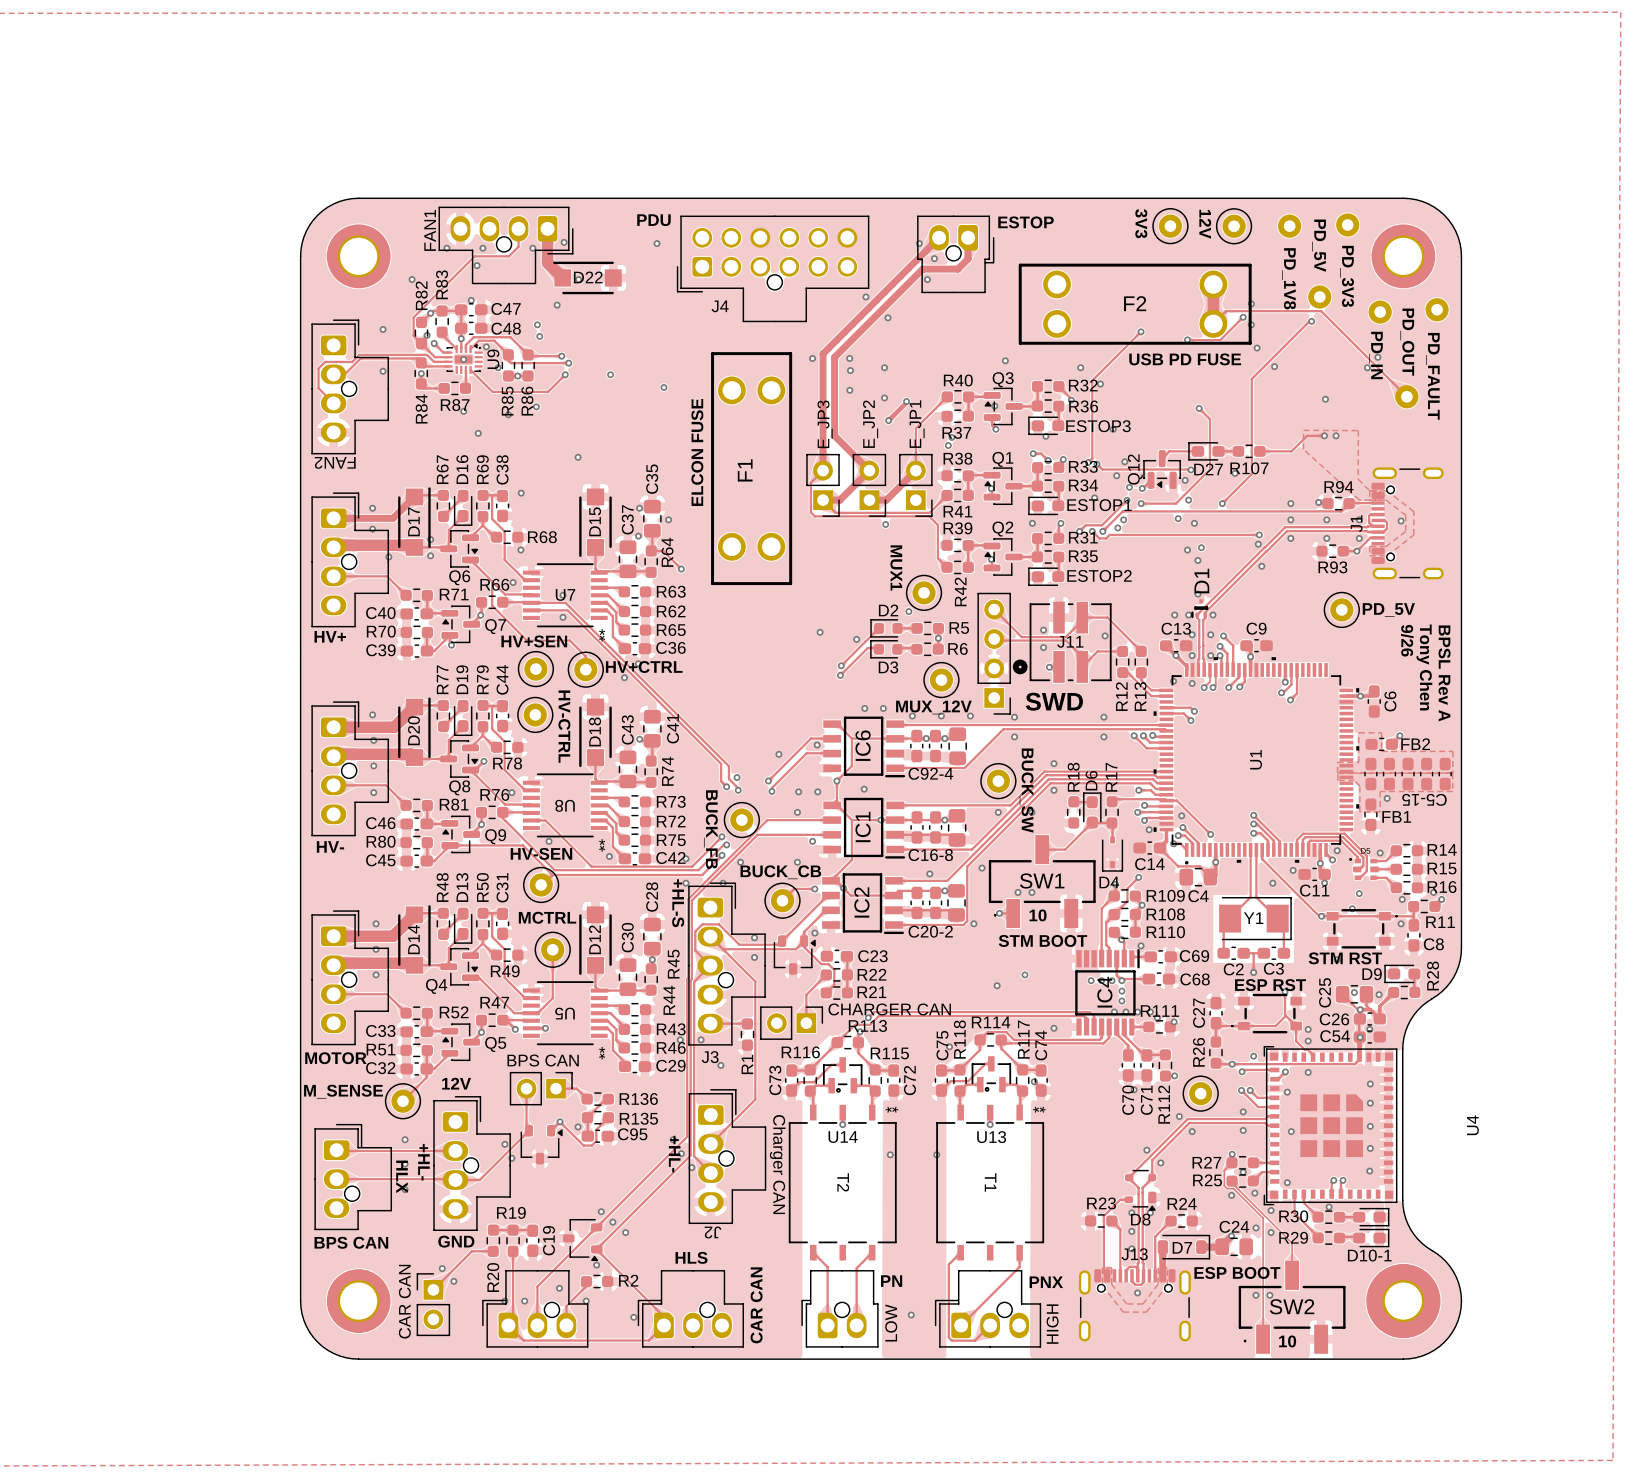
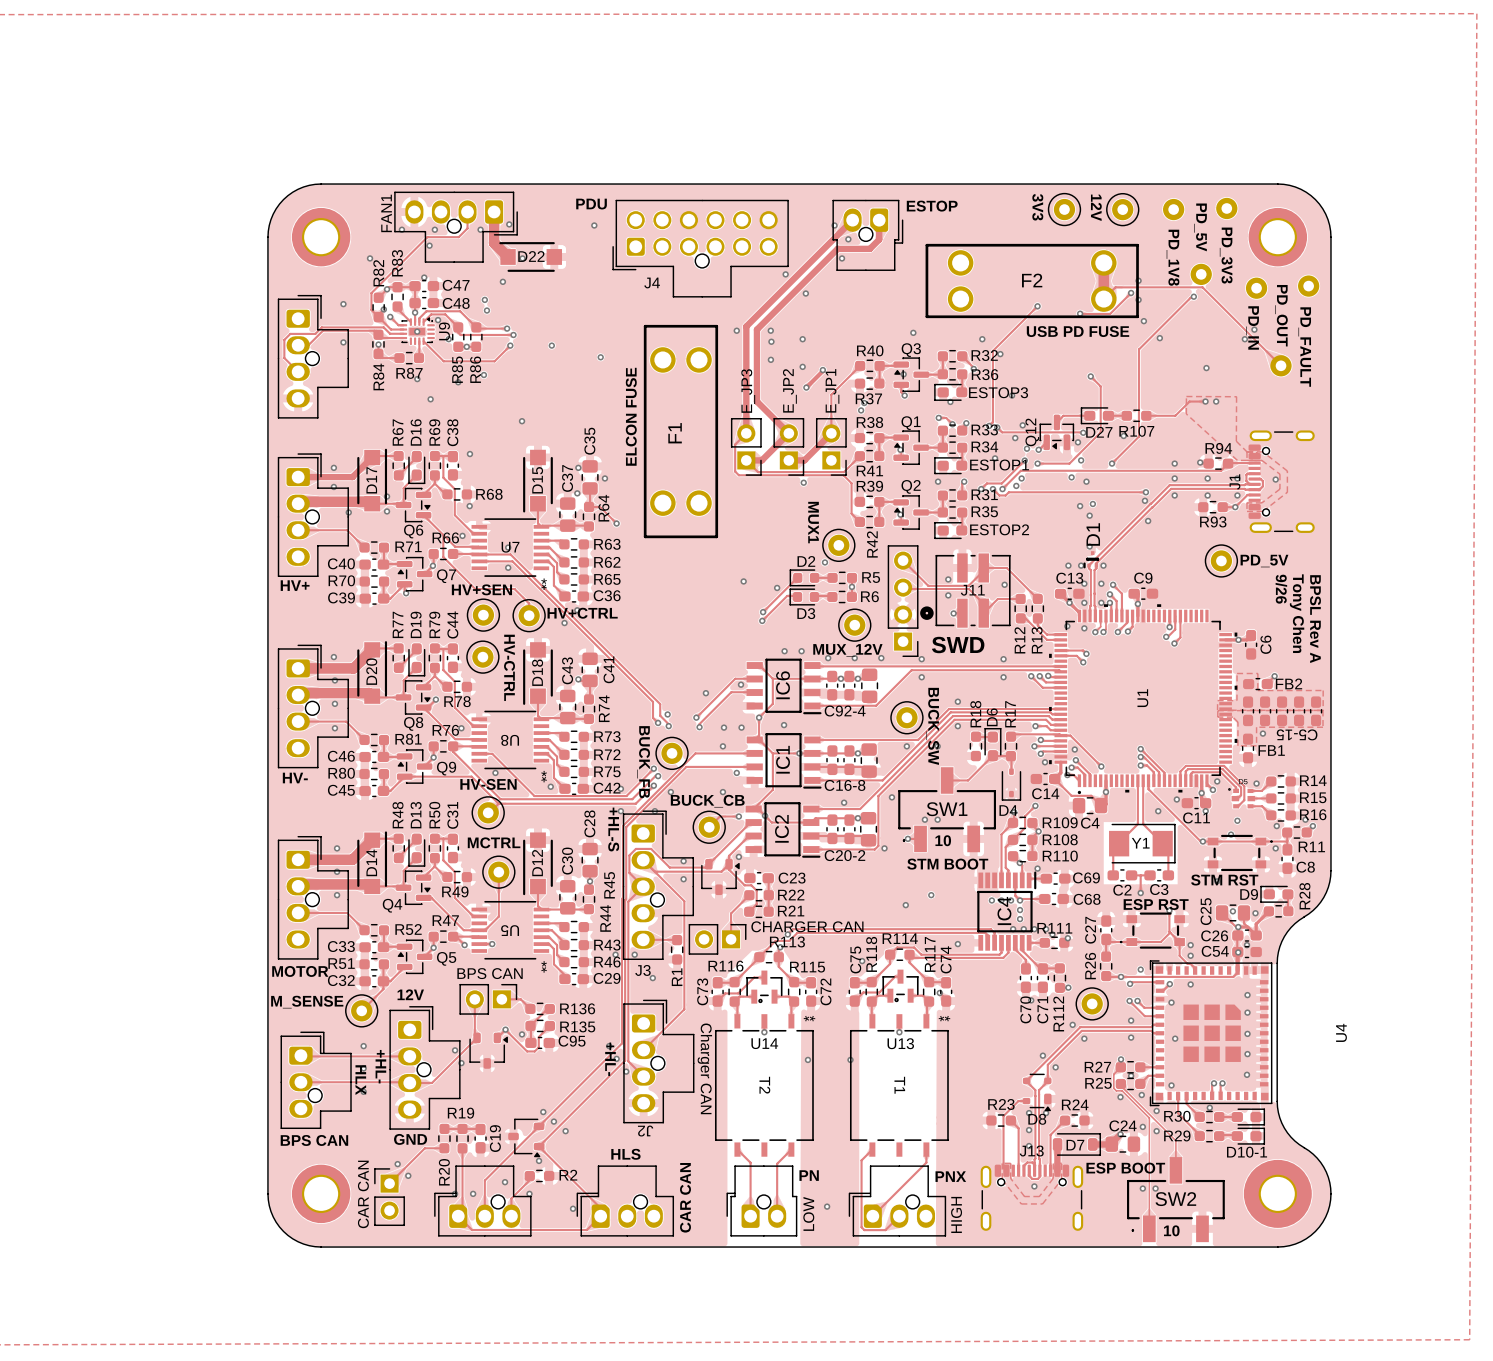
FAN2 name: FAN2 (335, 462) -> none

